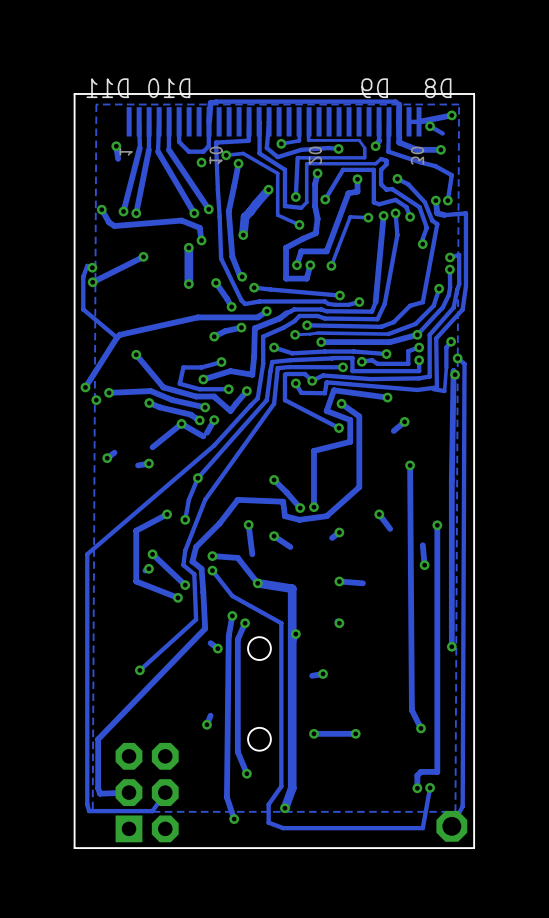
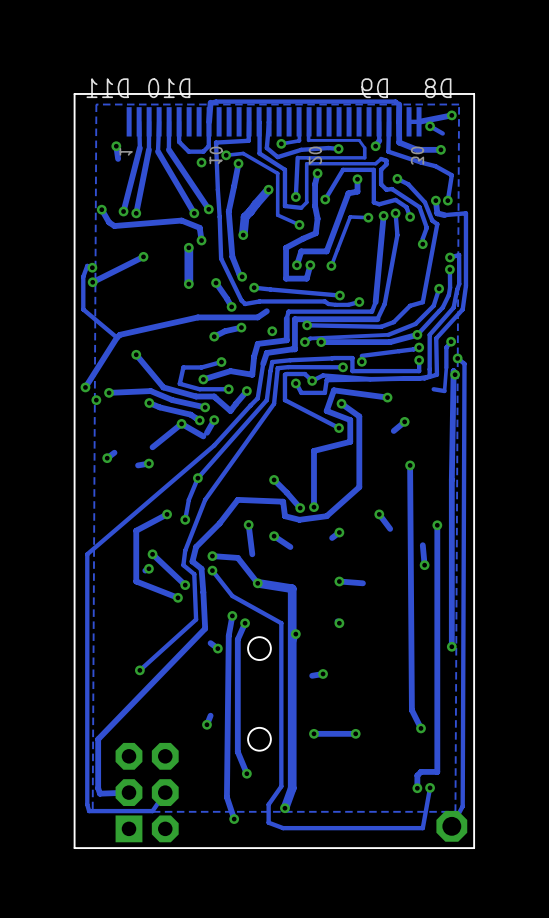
via: (266, 311) -> none
track: (372, 311) (294, 309) (279, 318) (254, 328) (254, 356) -> (372, 311) (288, 311) (286, 340) (257, 343) (254, 356)
track: (377, 319) (299, 315) (283, 327) (263, 336) (263, 363) -> (377, 319) (294, 319) (294, 349) (266, 352) (263, 363)
track: (415, 323) (388, 334) (317, 333) (295, 334) -> (415, 323) (388, 334) (310, 338) (304, 342)
via: none -> (272, 331)
via position: (295, 334) -> (304, 342)
track: (436, 338) (436, 387) (417, 389) (326, 382) (324, 393) (301, 392) (295, 383) -> (436, 338) (436, 374) (424, 378) (326, 380) (324, 392) (301, 392) (295, 382)
track: (274, 347) (292, 353) (353, 351) (386, 354) -> none
via: (274, 347) -> none
track: (413, 349) (408, 351) (408, 363) (377, 363) (372, 360) (361, 361) -> (413, 349) (361, 355)
via: (386, 354) -> none

